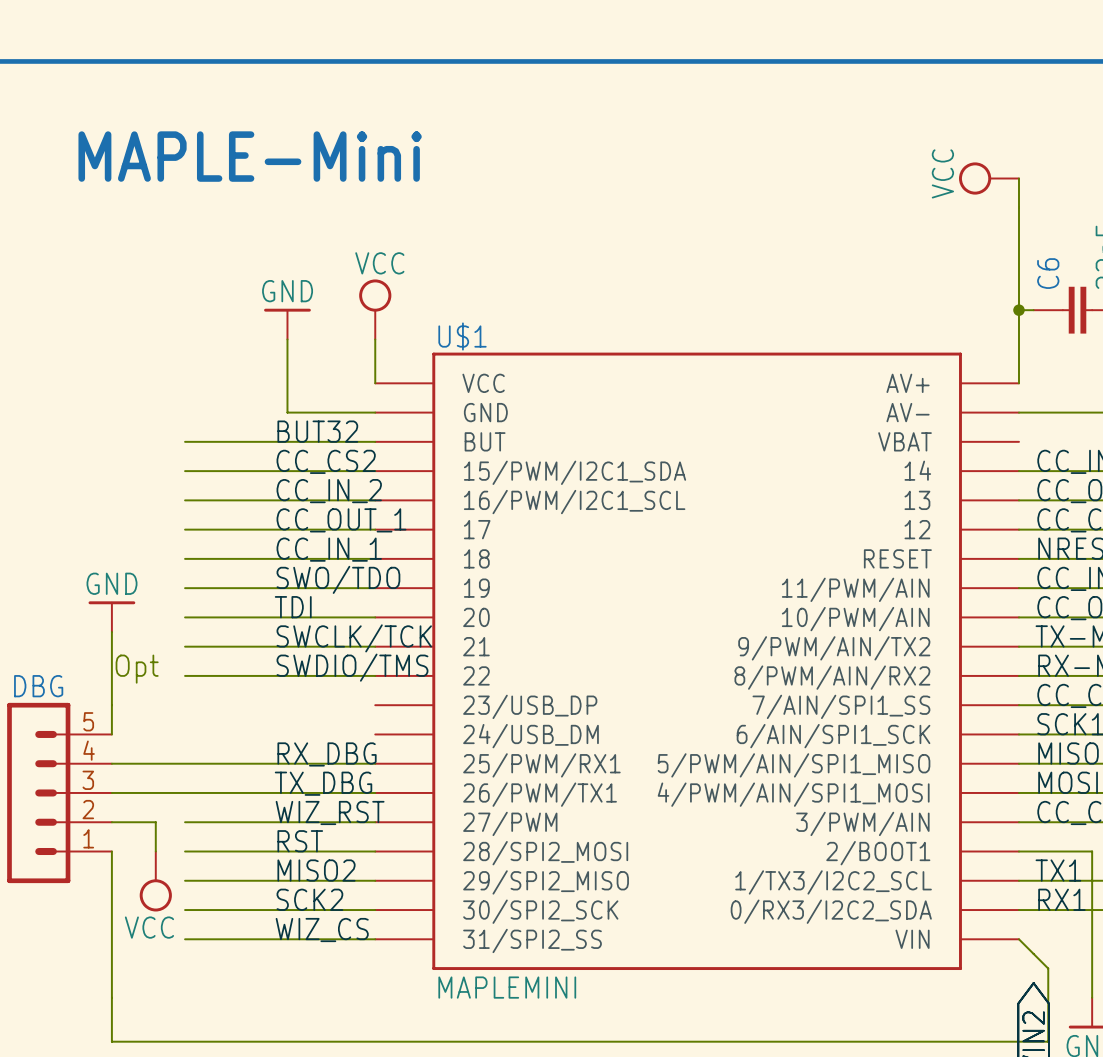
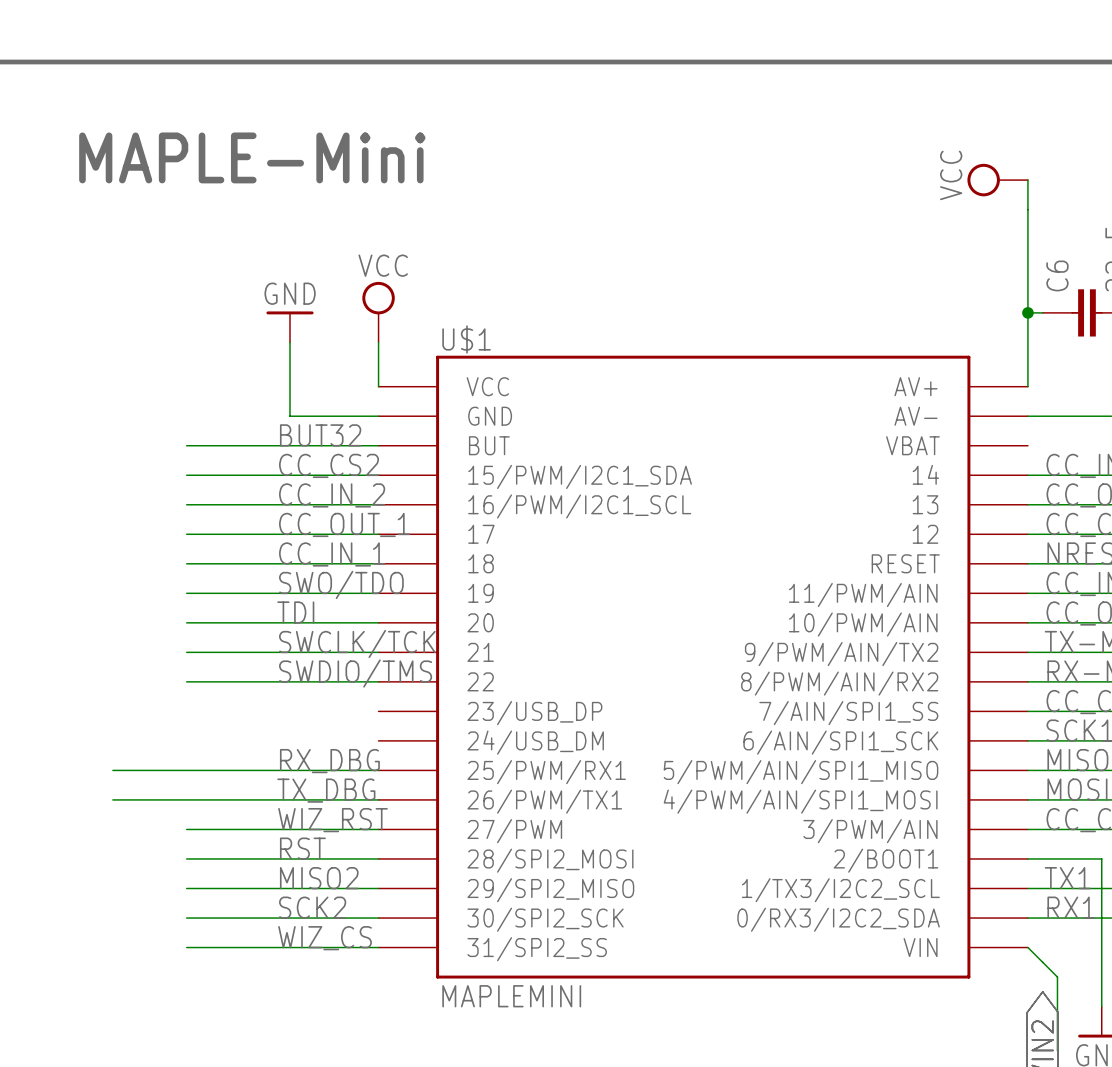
power symbol: GND (111, 616) -> none
wire: (111, 632) (111, 734) -> none
text: Opt (137, 669) -> none
DBG: (59, 792) -> none
wire: (111, 822) (155, 822) (155, 851) -> none
wire: (111, 851) (111, 1041) (1048, 1041) -> none
power symbol: VCC (155, 881) -> none

